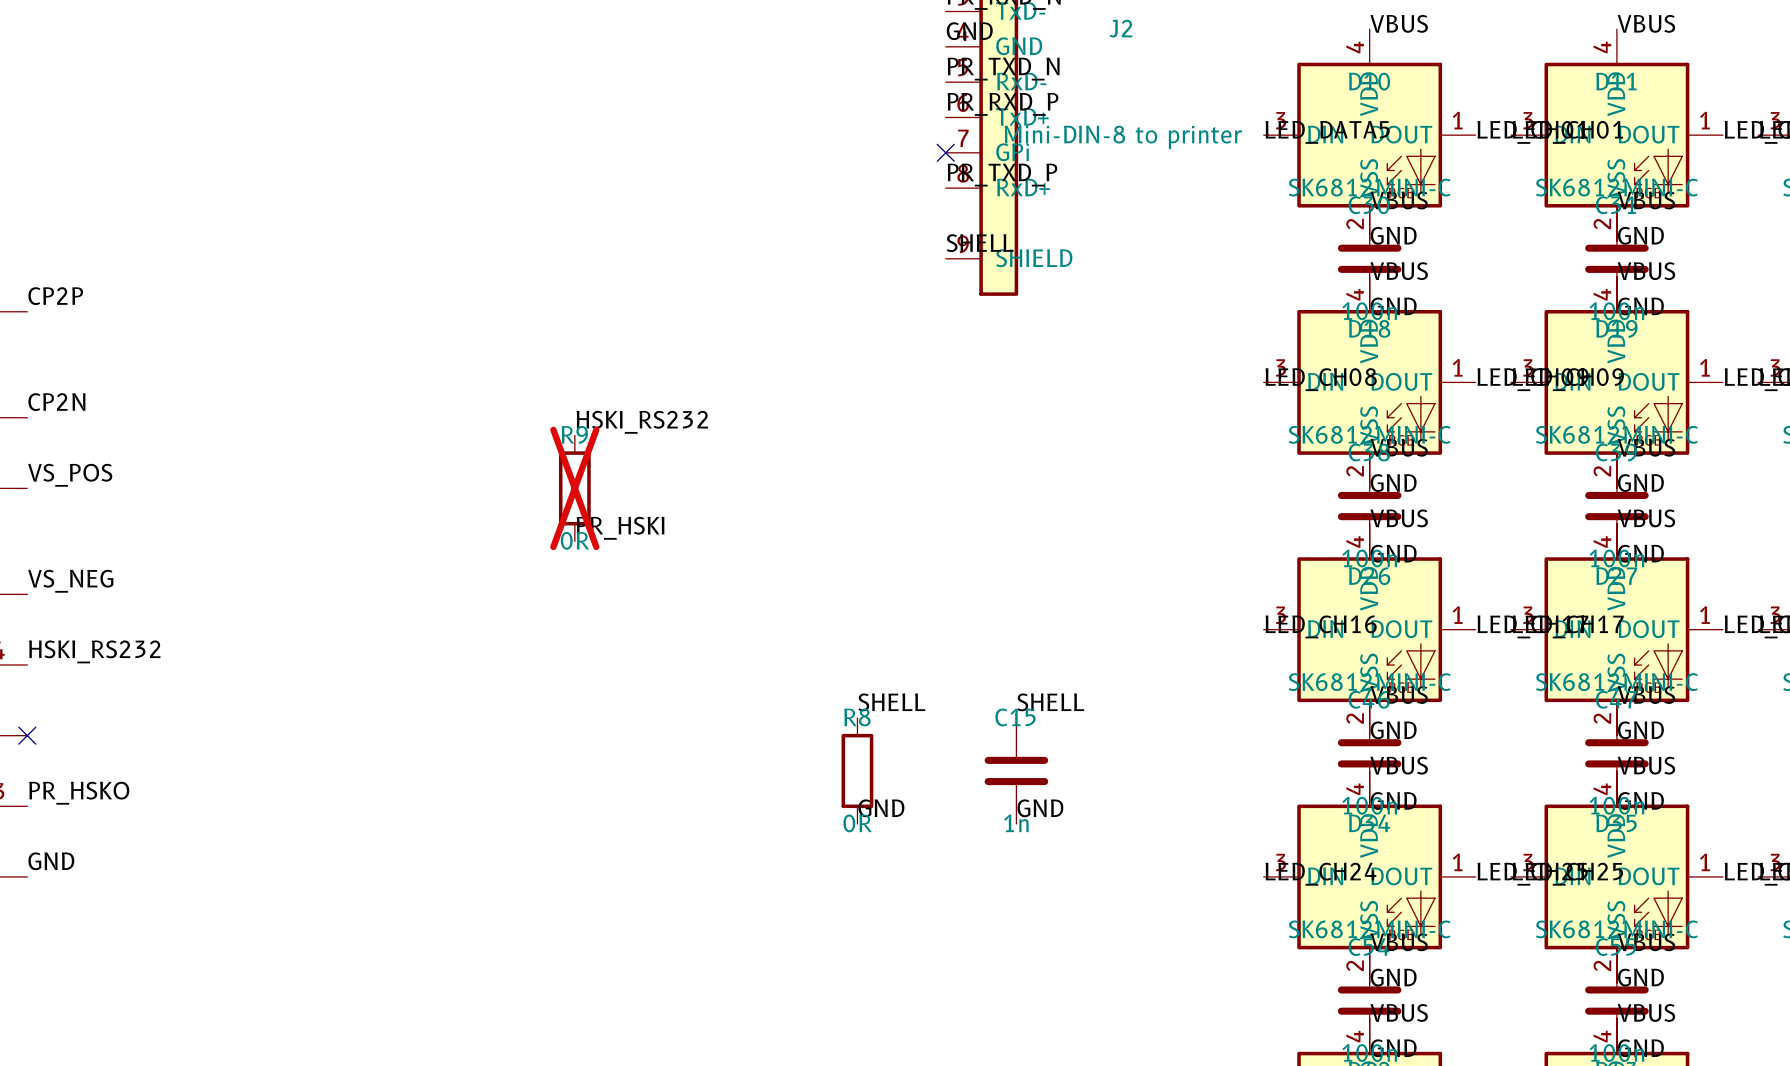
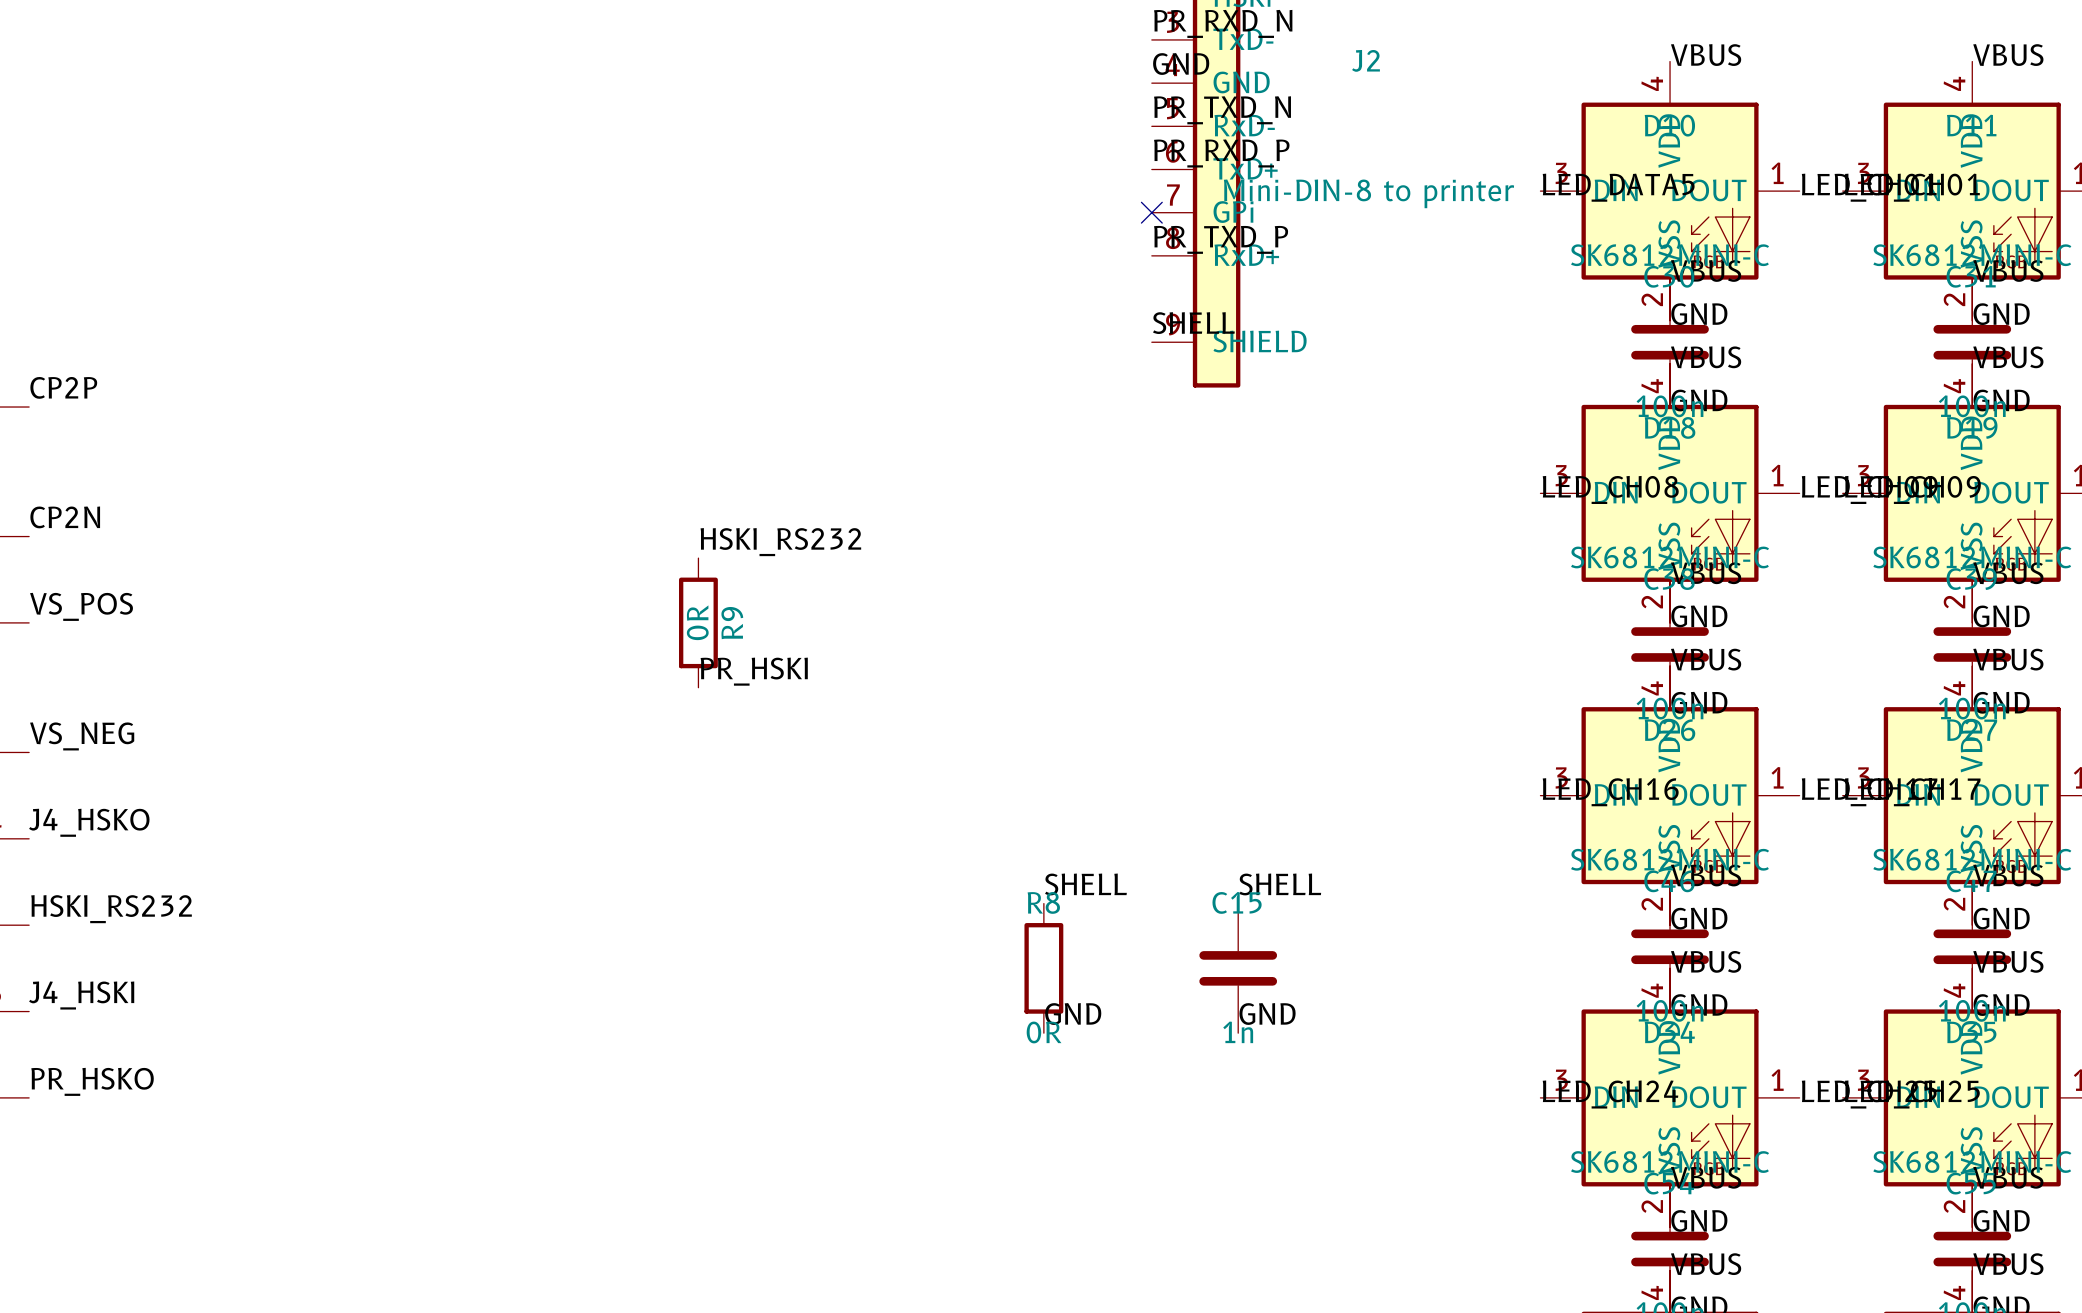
R9 name rotation: 0° (574, 434) -> 90° counterclockwise (732, 623)
R9 name position: R9 (574, 434) -> R9 (732, 623)
R9 do-not-place cross: (574, 488) -> none
R9 value rotation: 0° (575, 540) -> 90° counterclockwise (697, 622)
R9 value position: 0R (575, 540) -> 0R (697, 622)
label: HSKI_RS232 (94, 651) -> J4_HSKO (89, 822)
label: none -> HSKI_RS232 (111, 909)
no-connect mark: (27, 735) -> none
label: PR_HSKO (79, 793) -> J4_HSKI (81, 995)
label: GND (51, 861) -> PR_HSKO (92, 1081)

